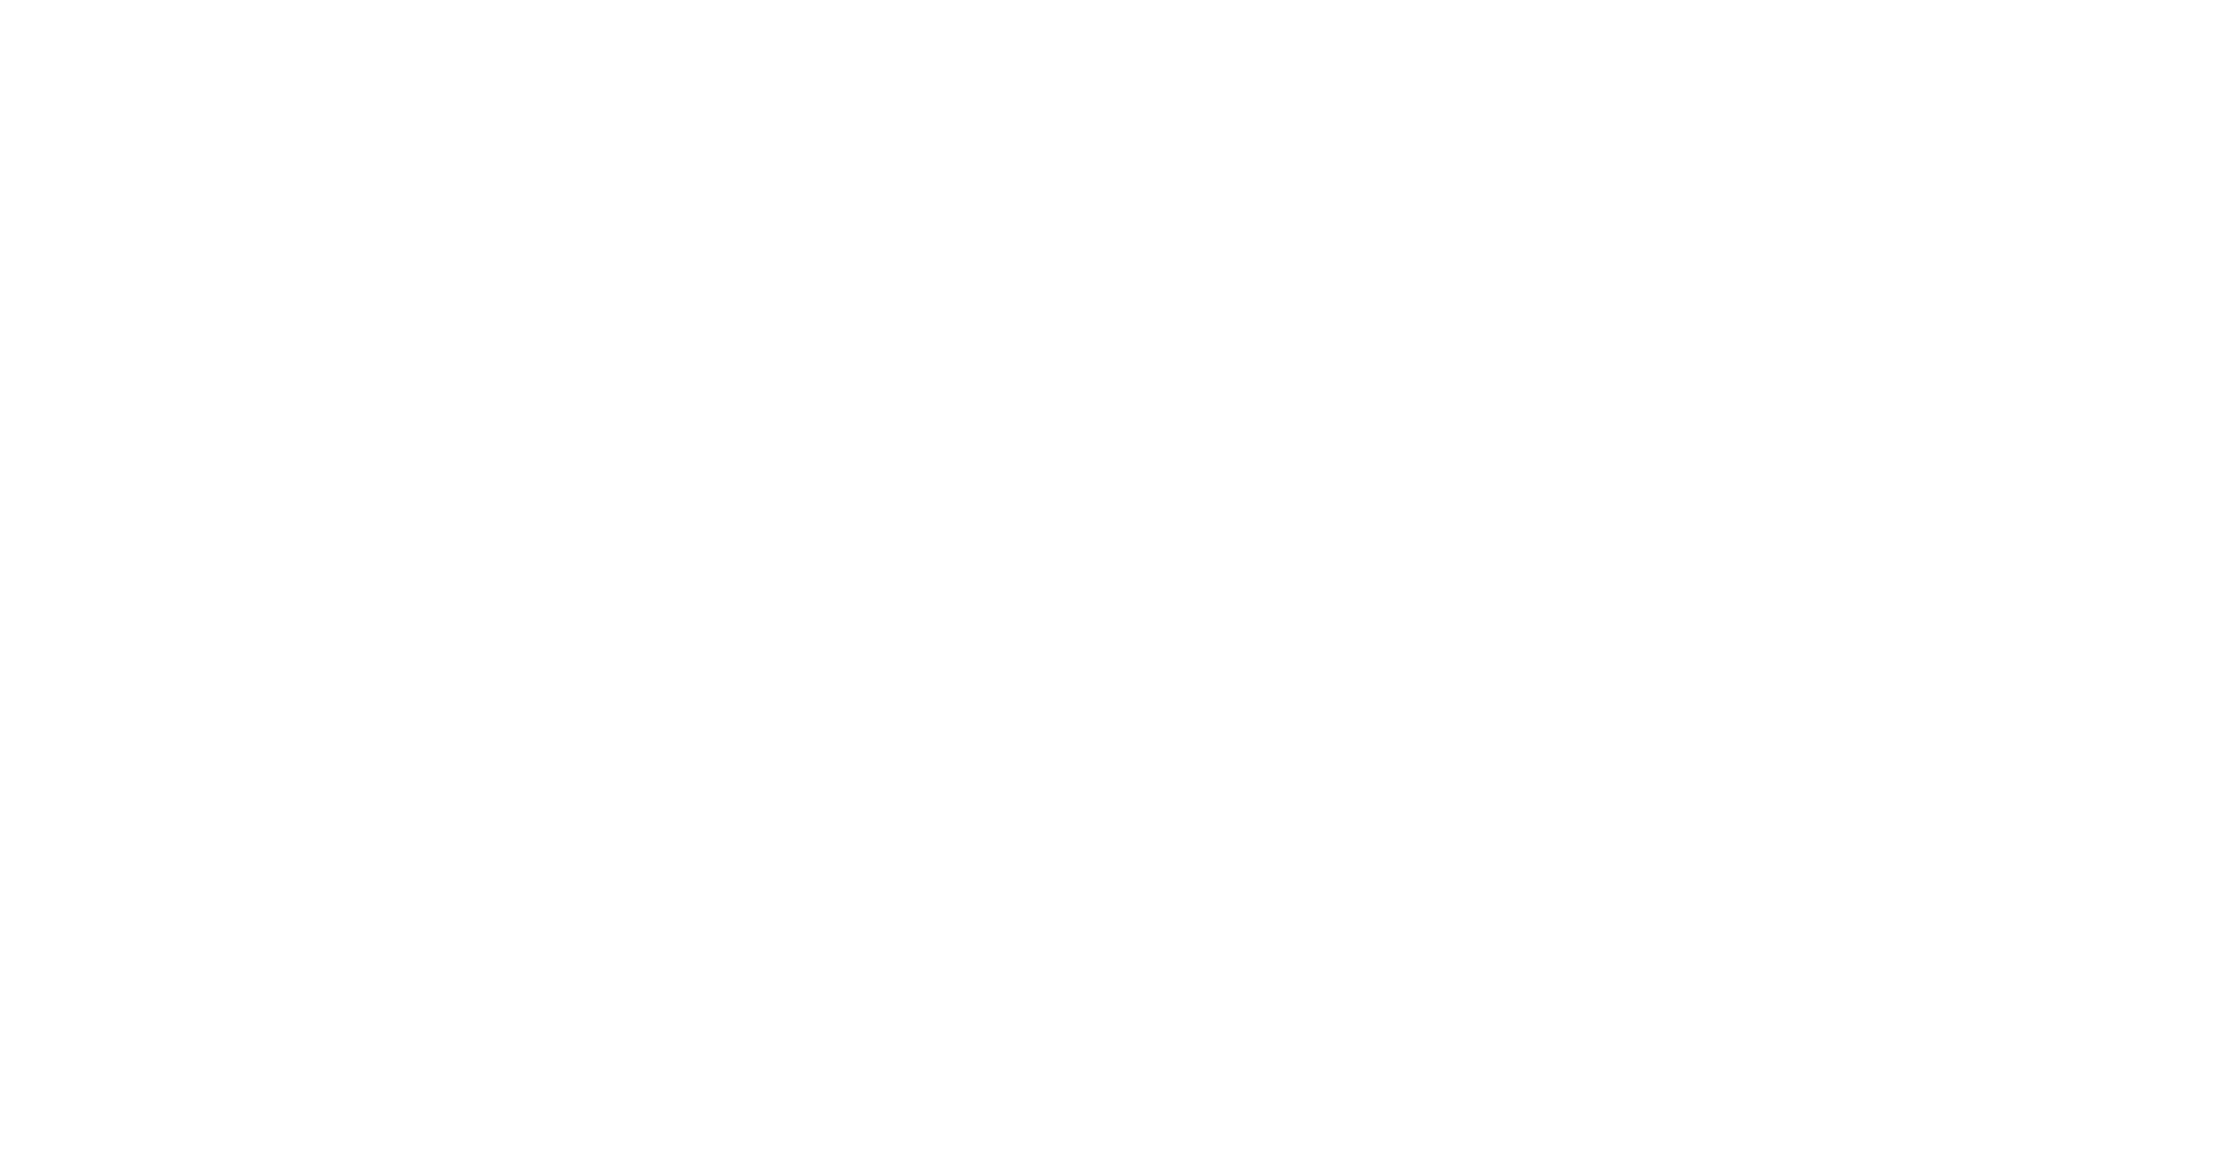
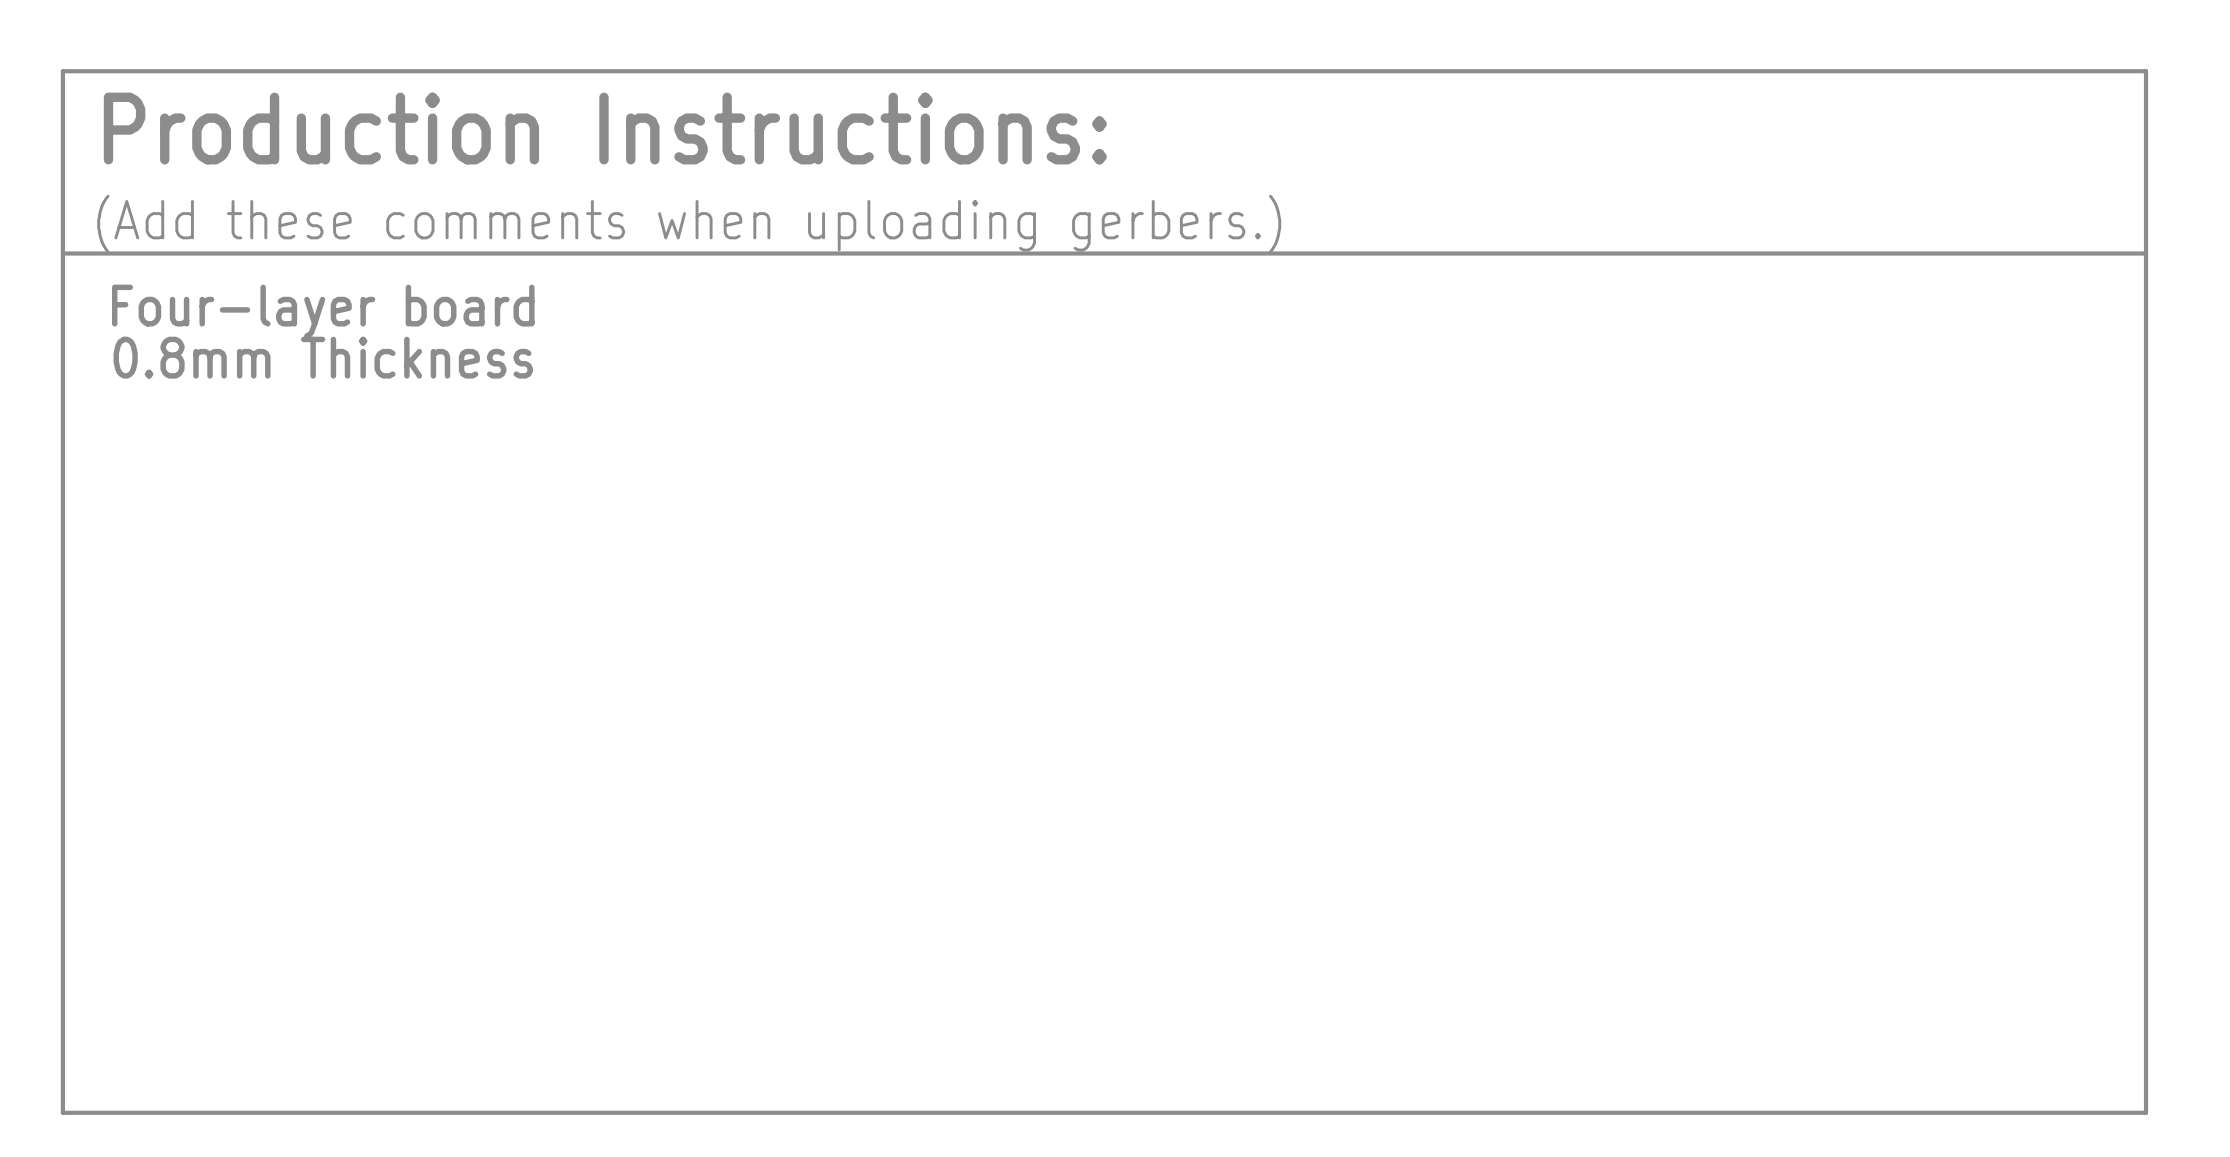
drawing: none -> [60, 69, 2149, 1115]
text: none -> Four-layer board (323, 311)
text: none -> 0.8mm Thickness (323, 357)

